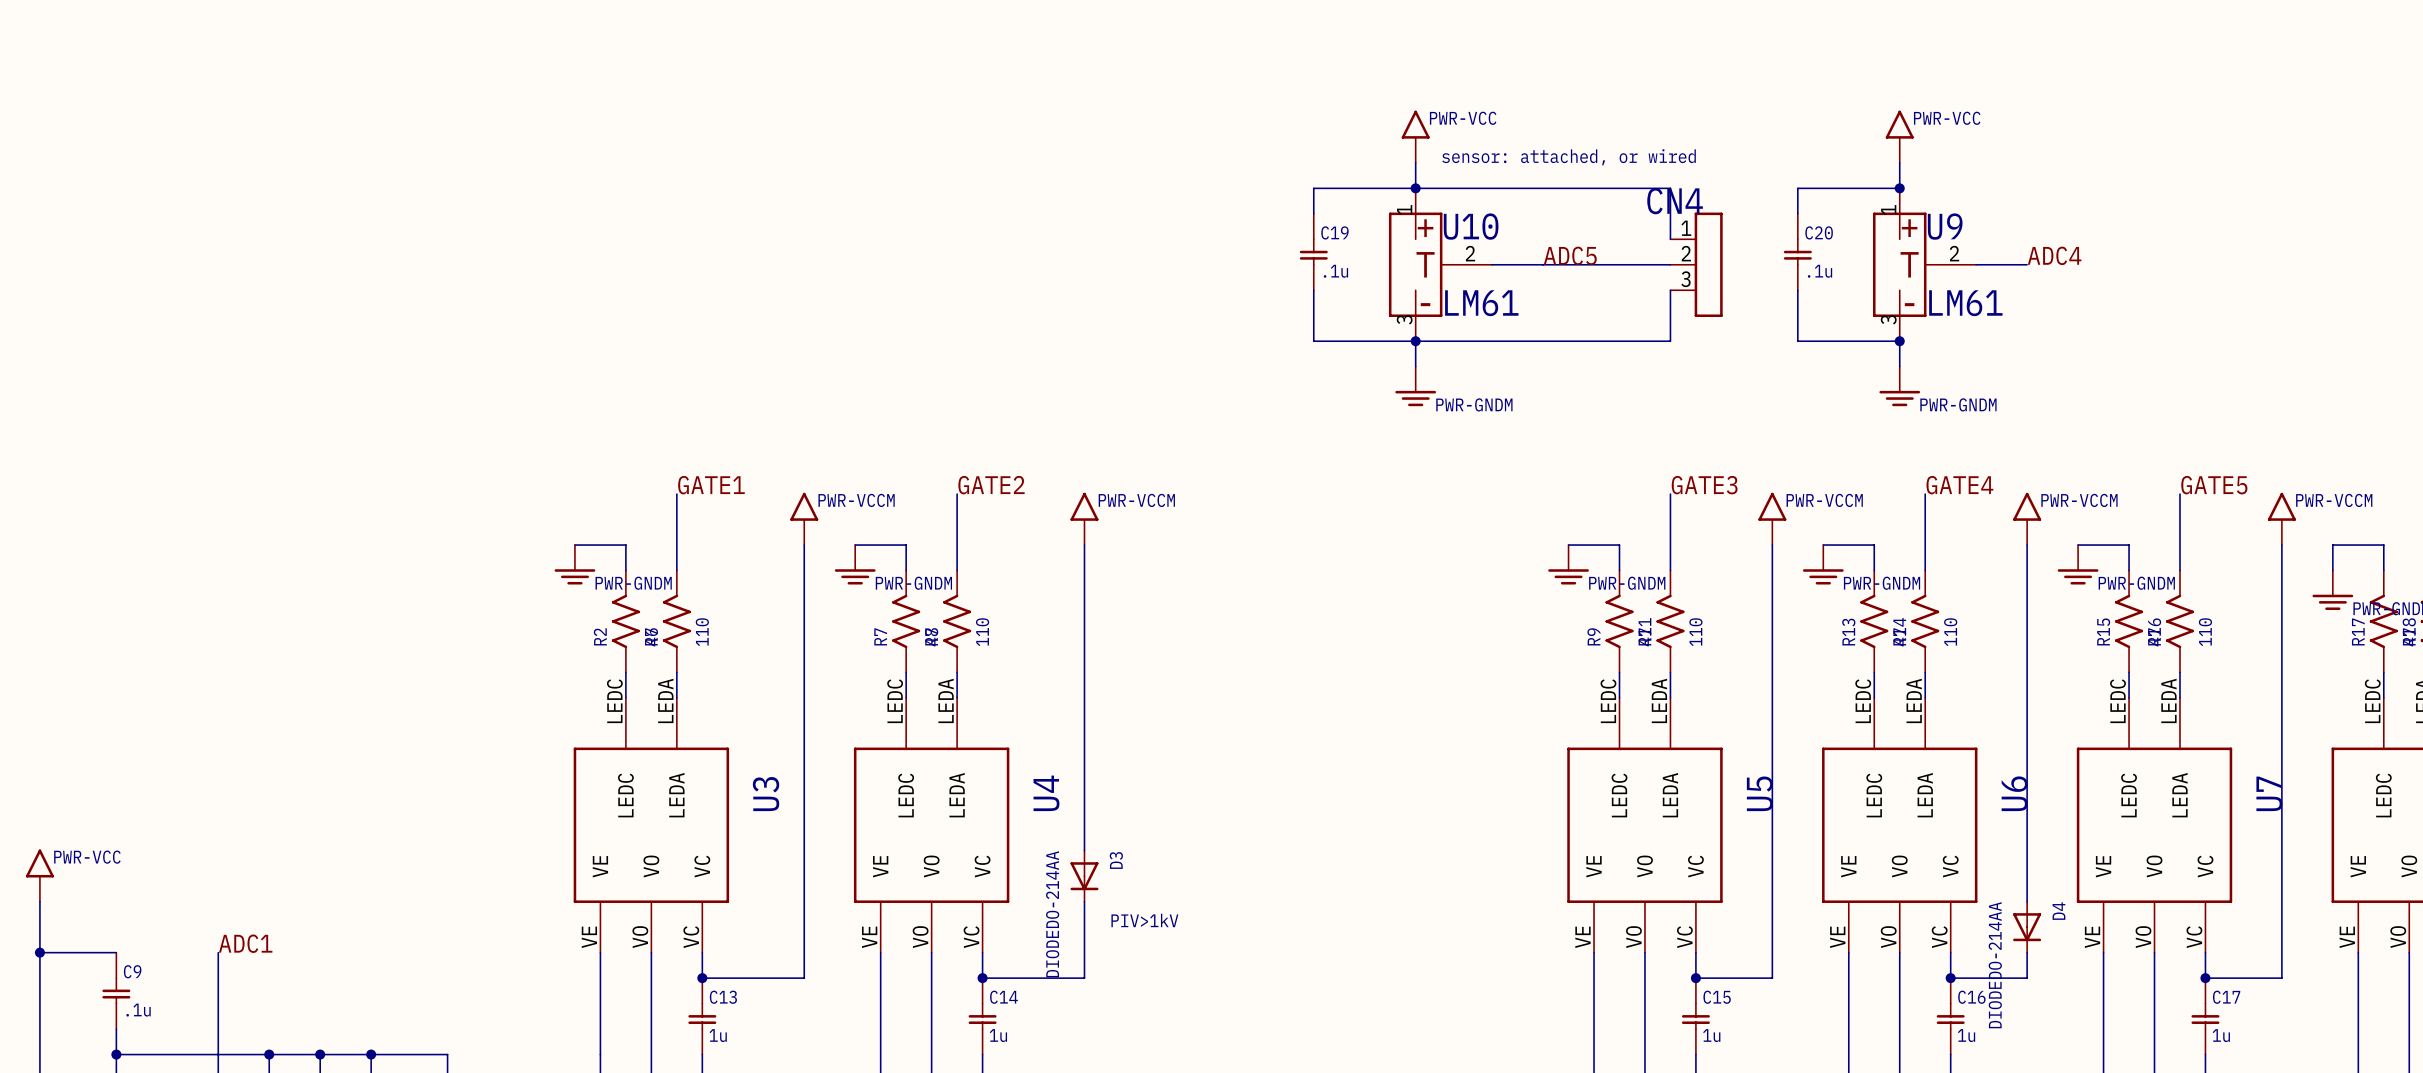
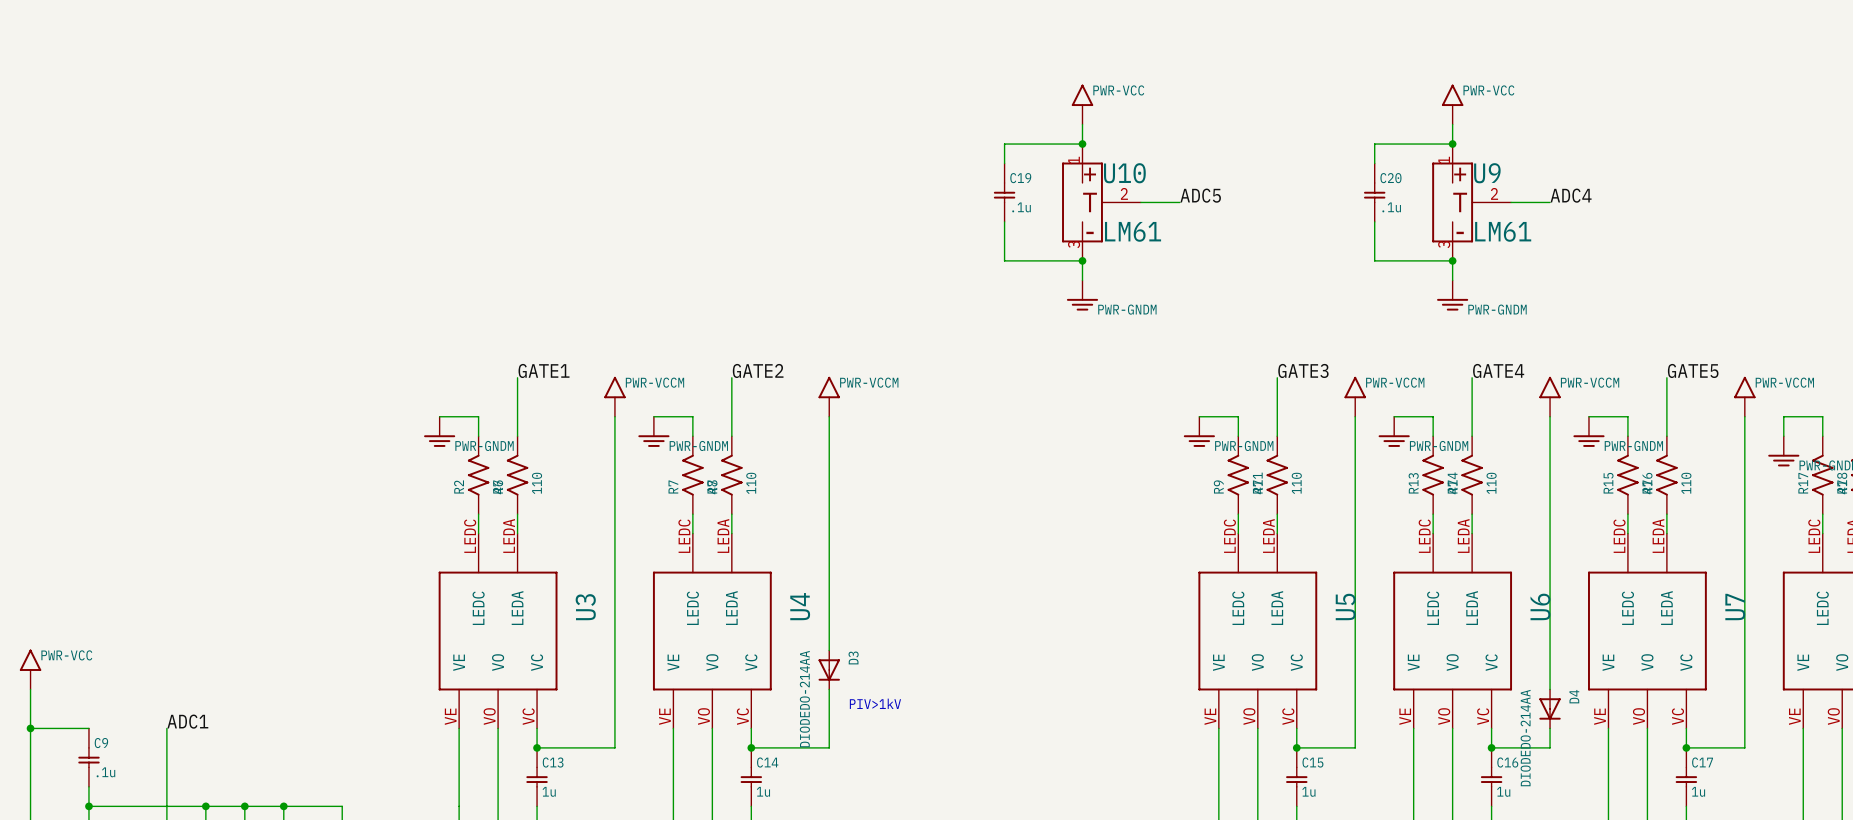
text: sensor: attached, or wired (1569, 157) -> none
wire: (1415, 188) (1670, 188) (1670, 239) -> none
wire: (1543, 264) (1670, 264) -> none
CN4: (1696, 264) -> none
wire: (1670, 290) (1670, 341) (1415, 341) -> none

